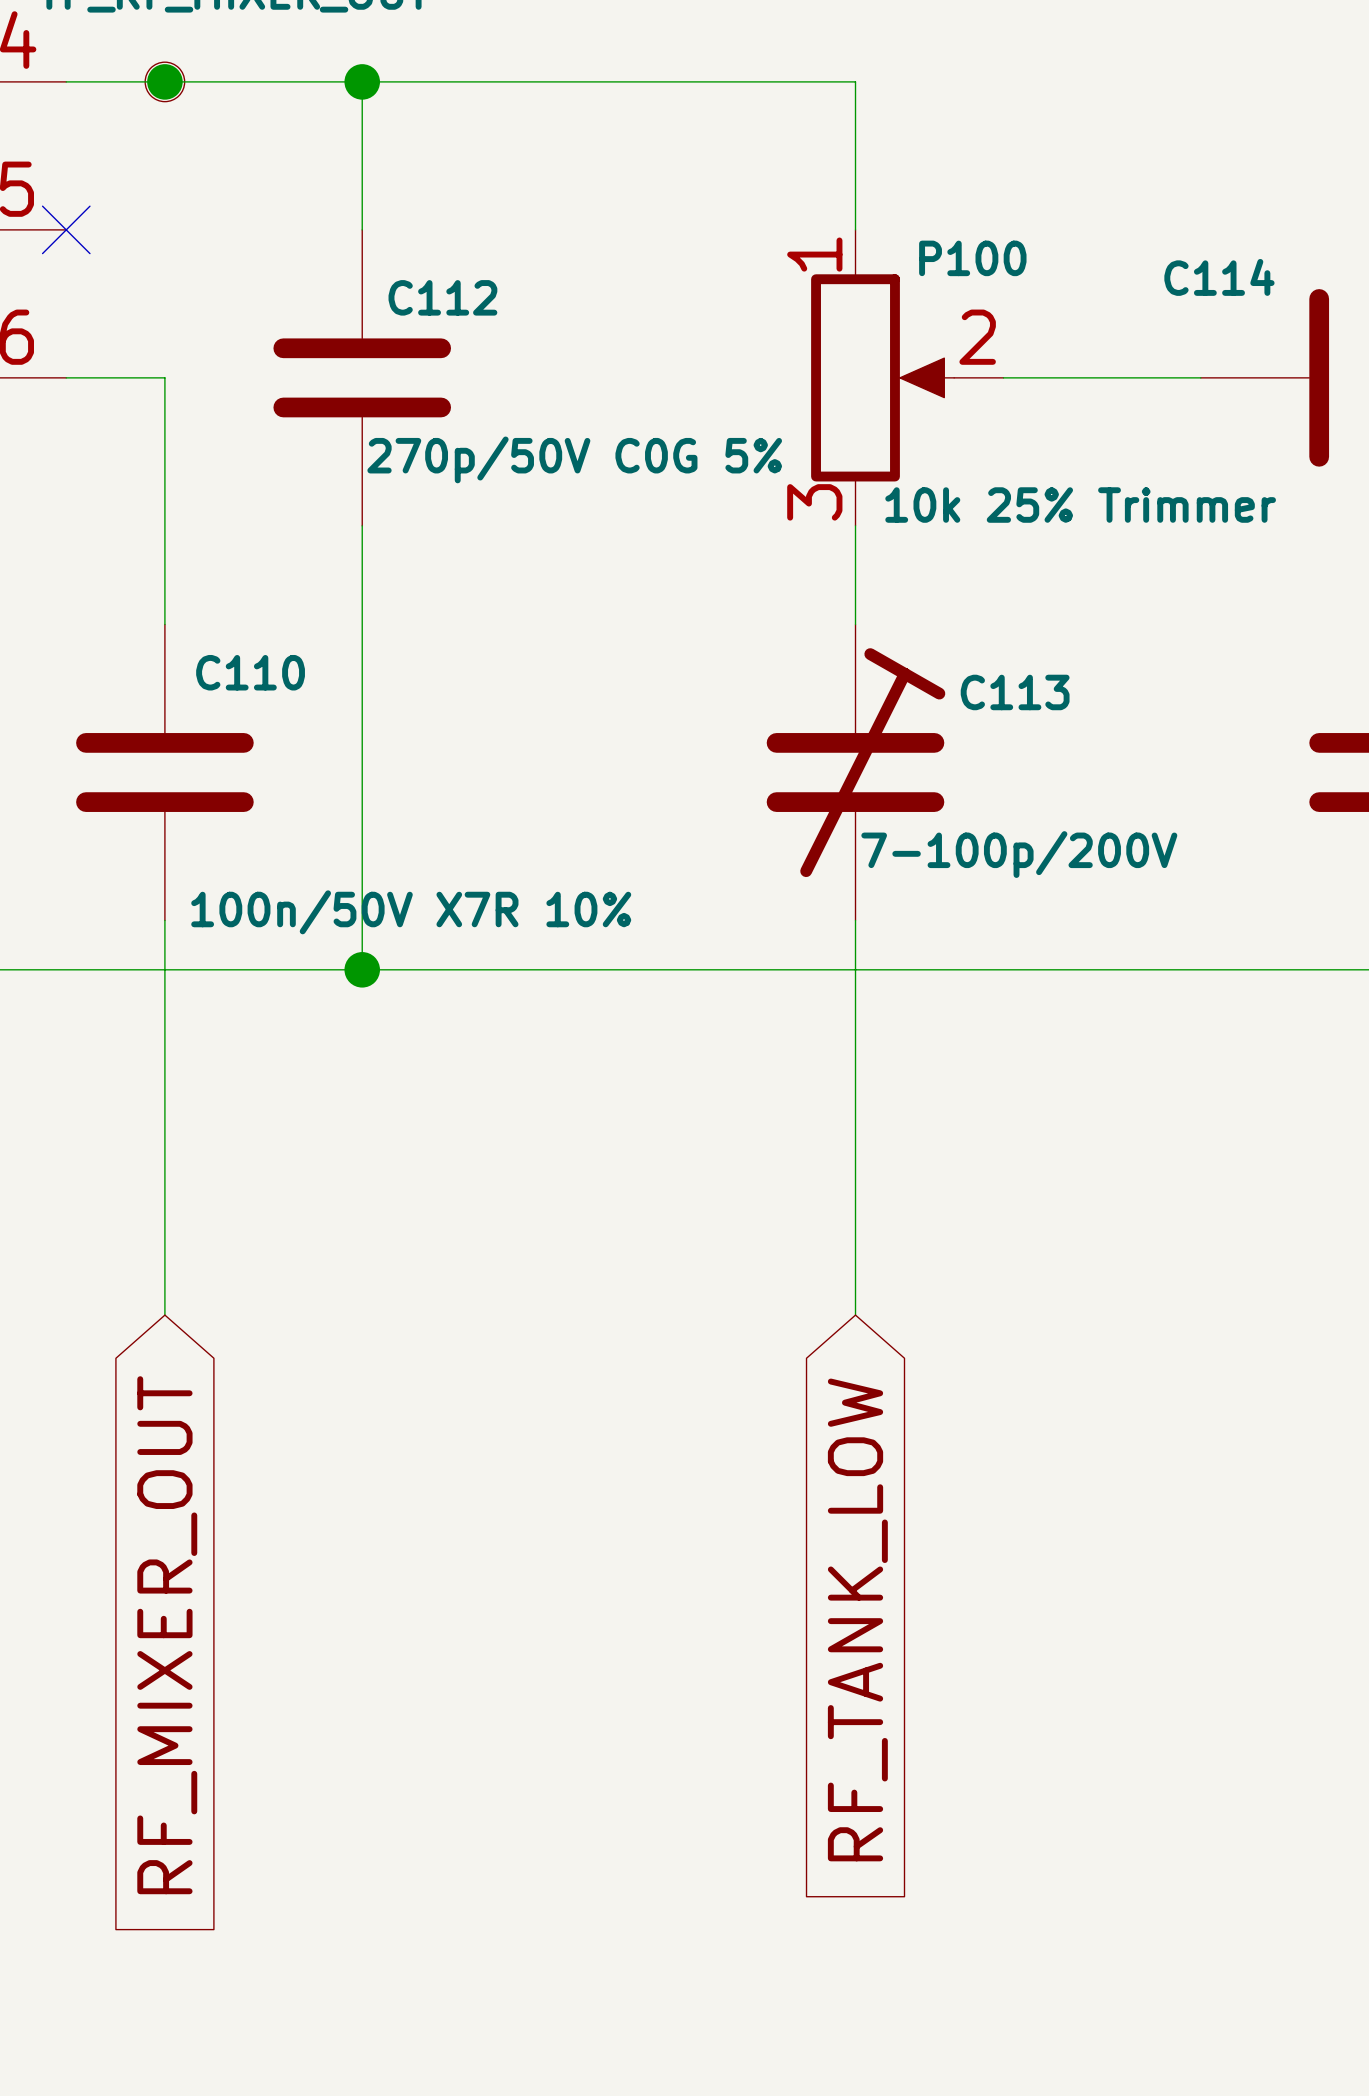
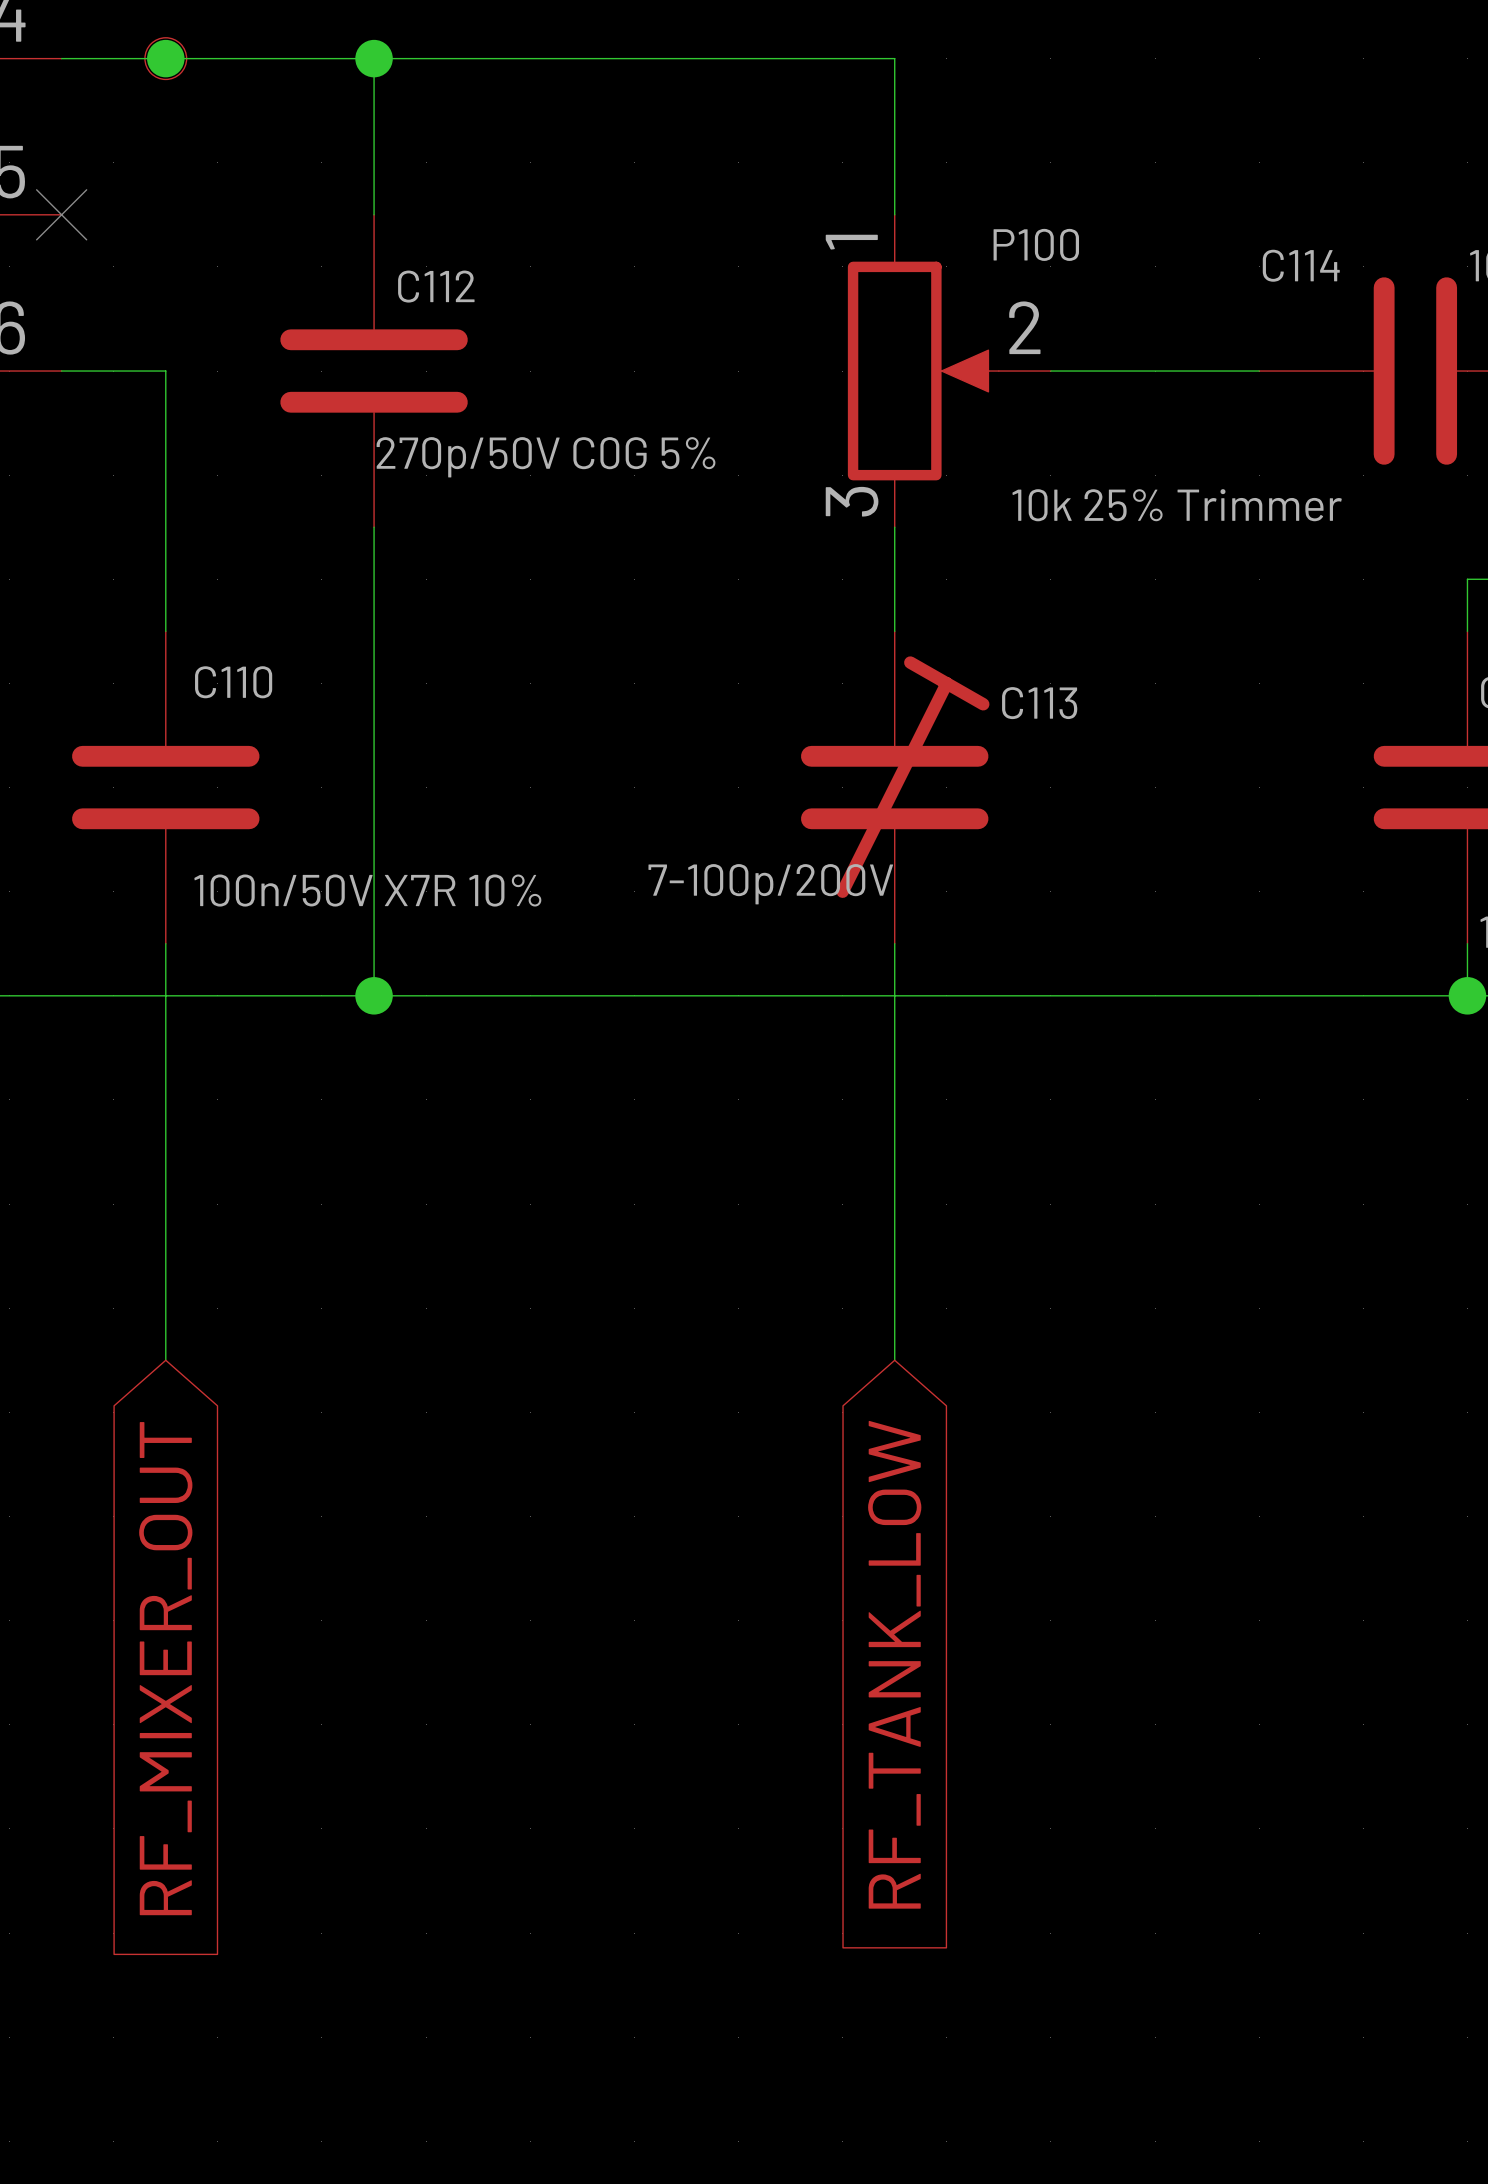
C113 value position: 7-100p/200V (1019, 854) -> 7-100p/200V (770, 884)
C110 value position: 100n/50V X7R 10% (411, 912) -> 100n/50V X7R 10% (367, 890)

